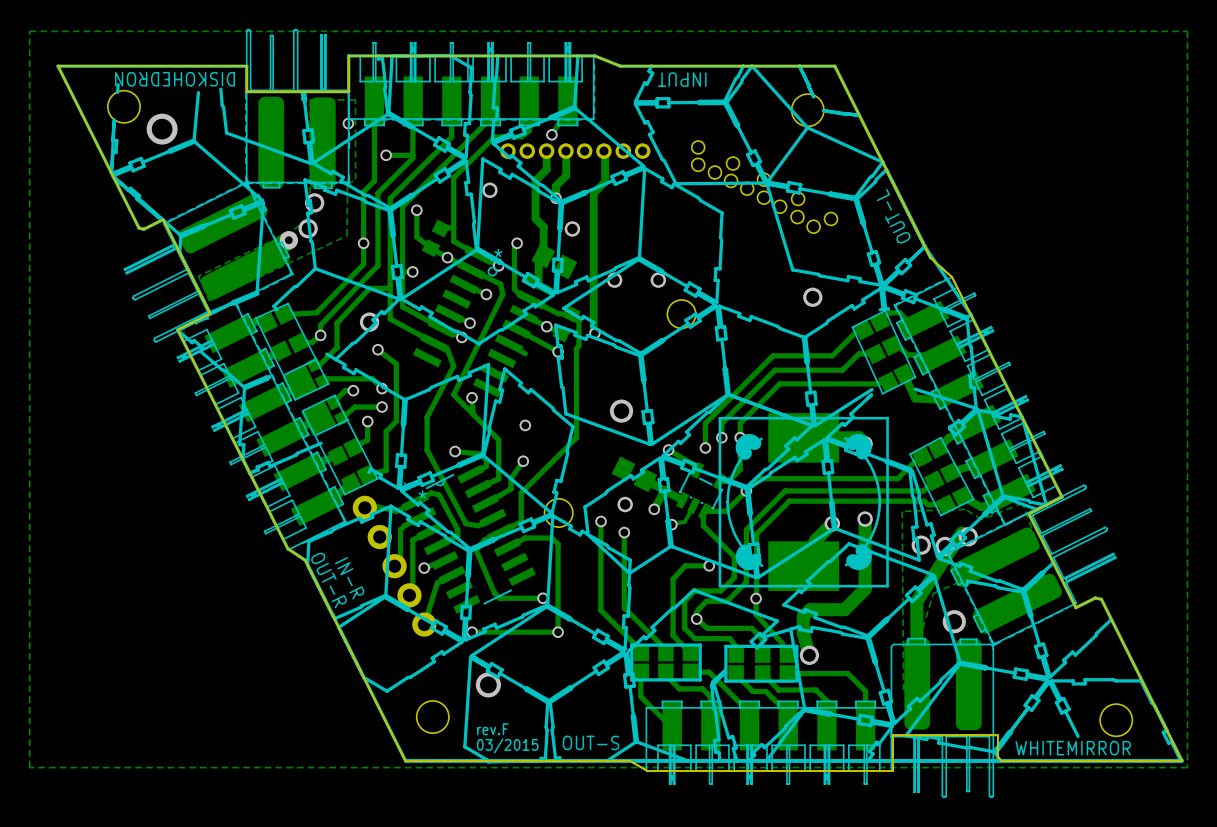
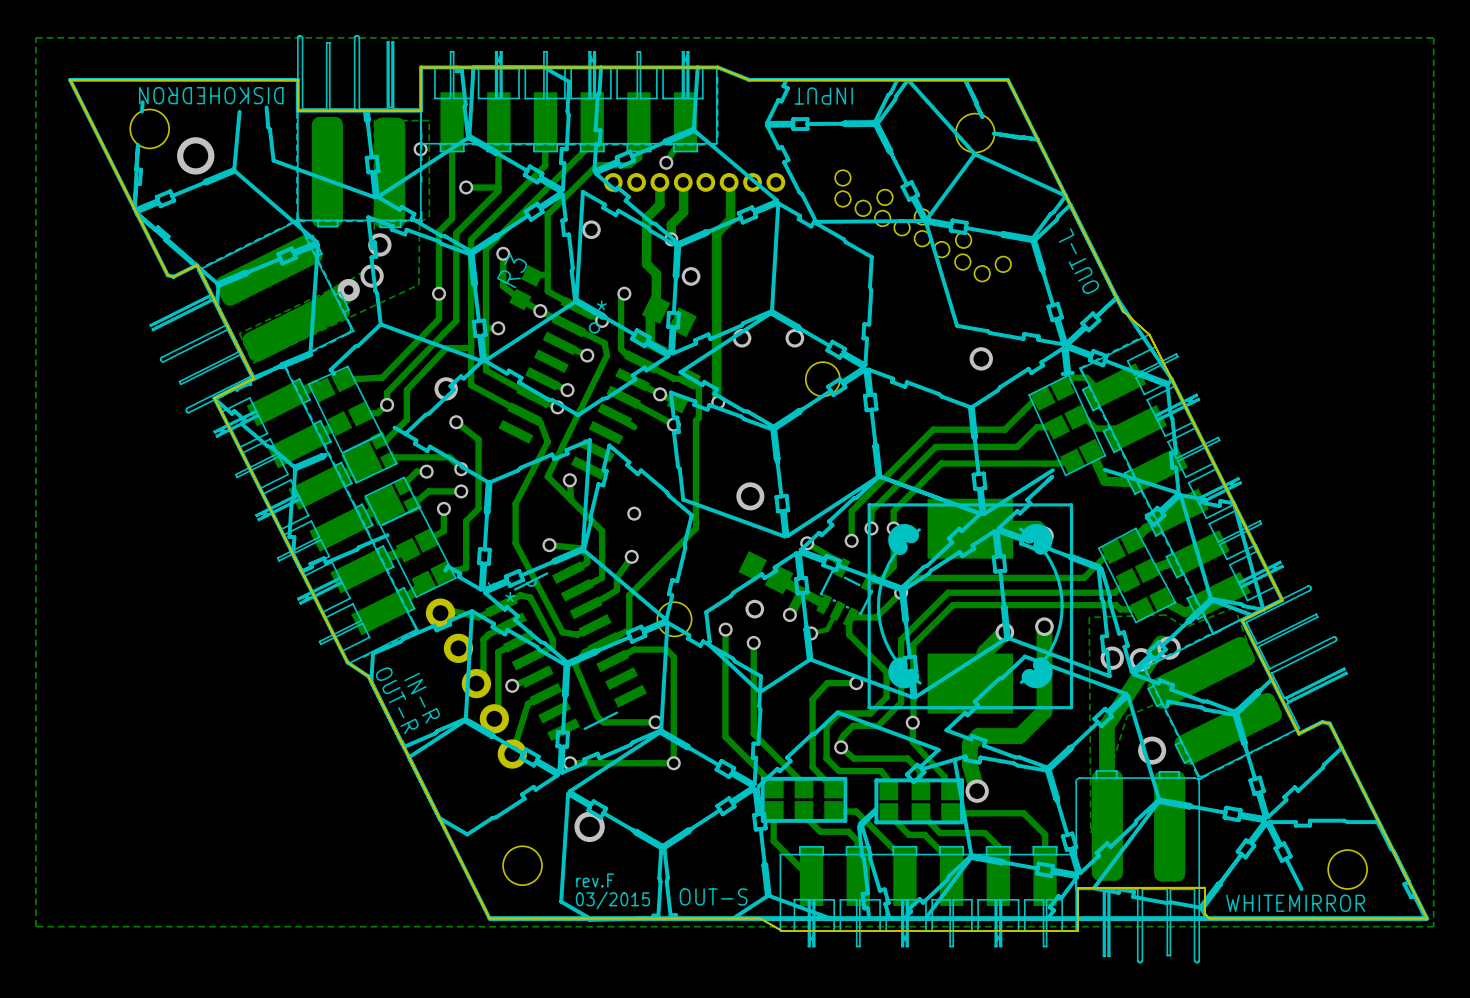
R3 name: none -> R3 (512, 270)

